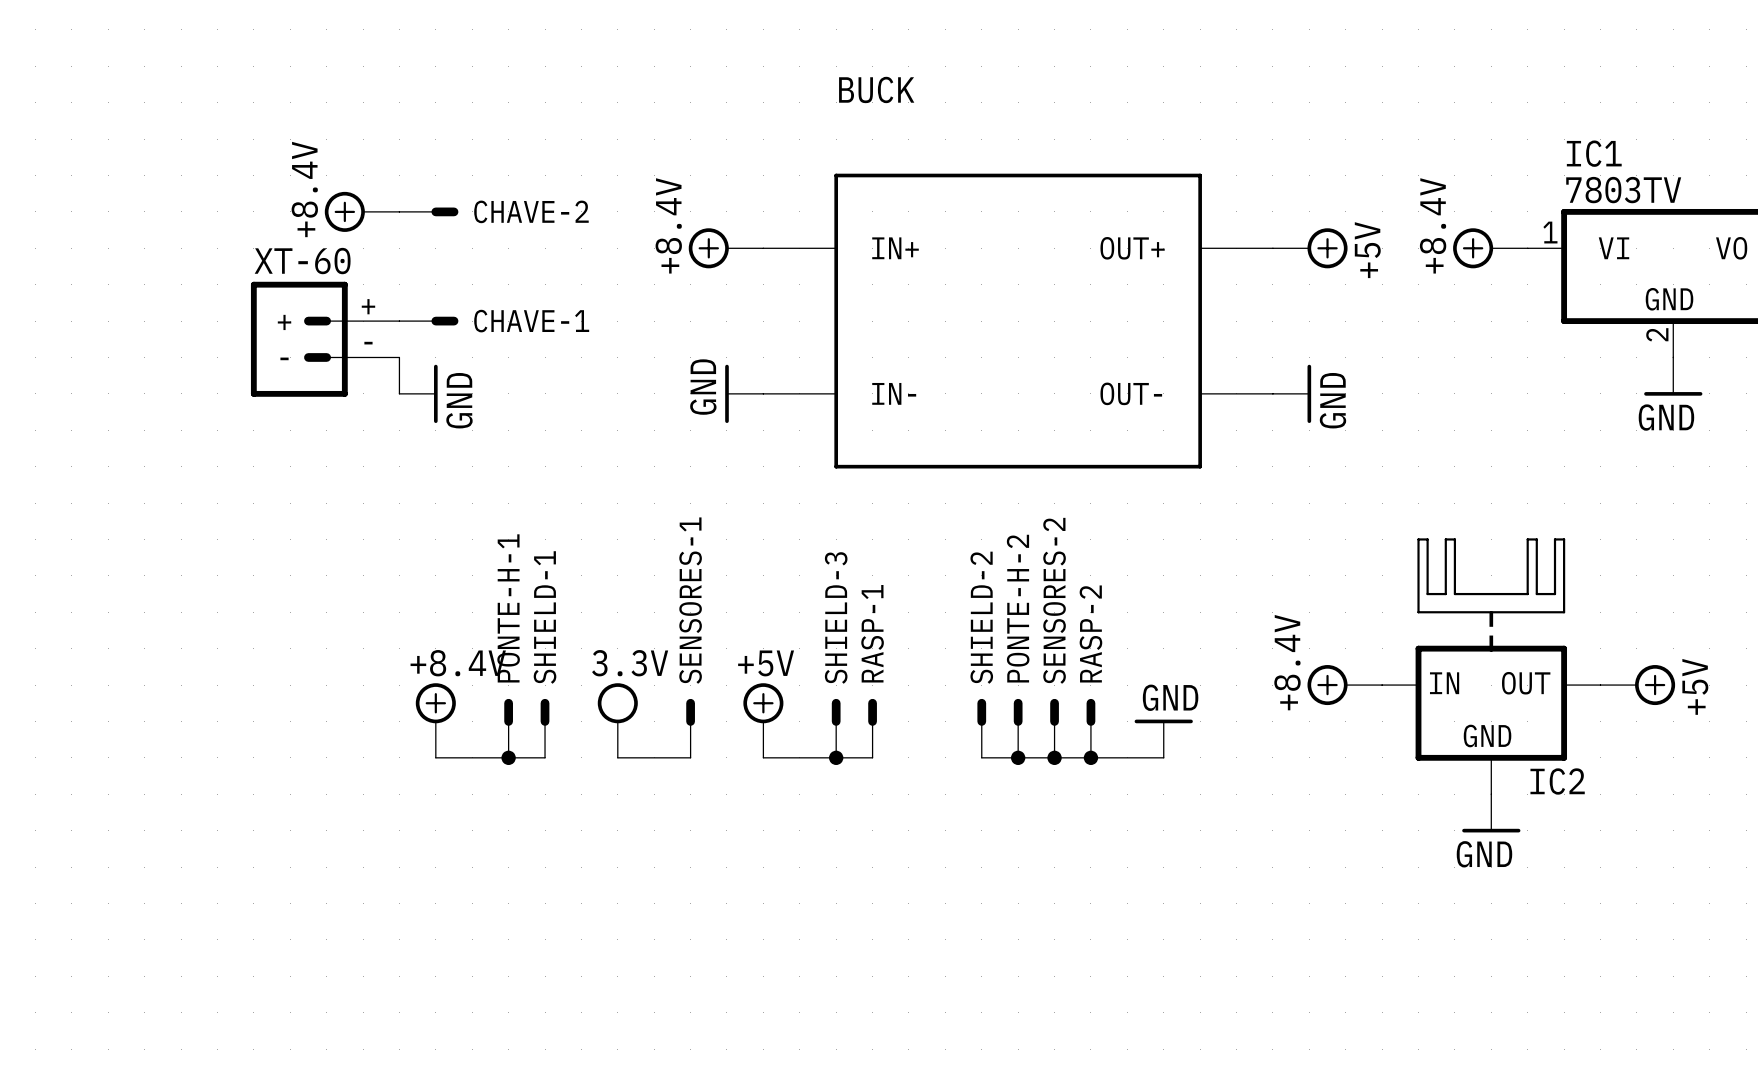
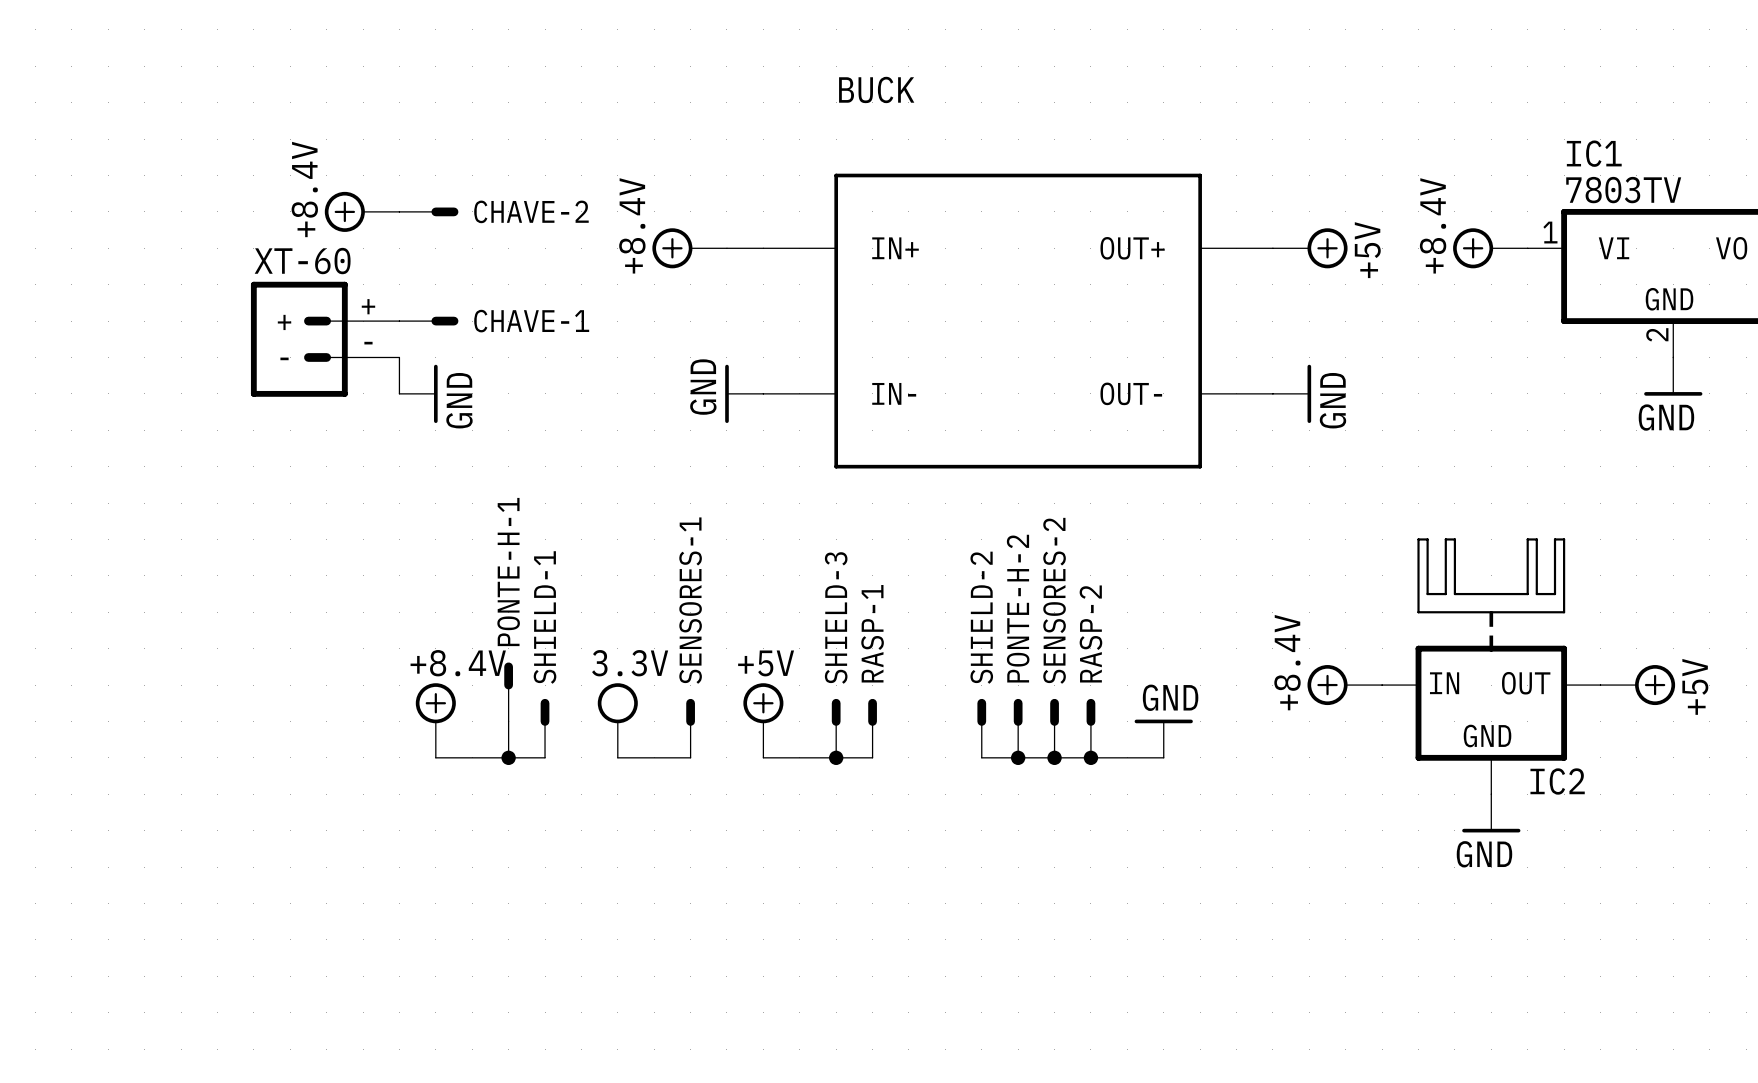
power symbol position: +8.4V (726, 248) -> +8.4V (689, 248)
PONTE-H-1 position: (508, 728) -> (508, 691)

